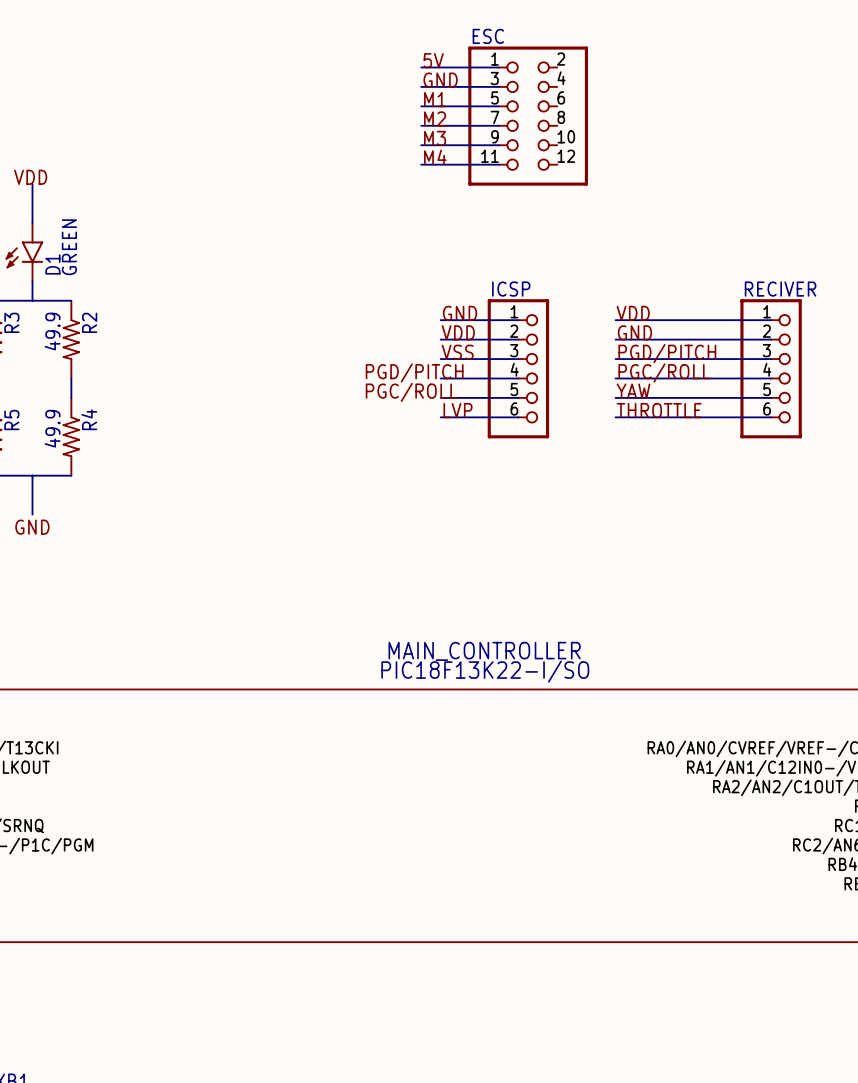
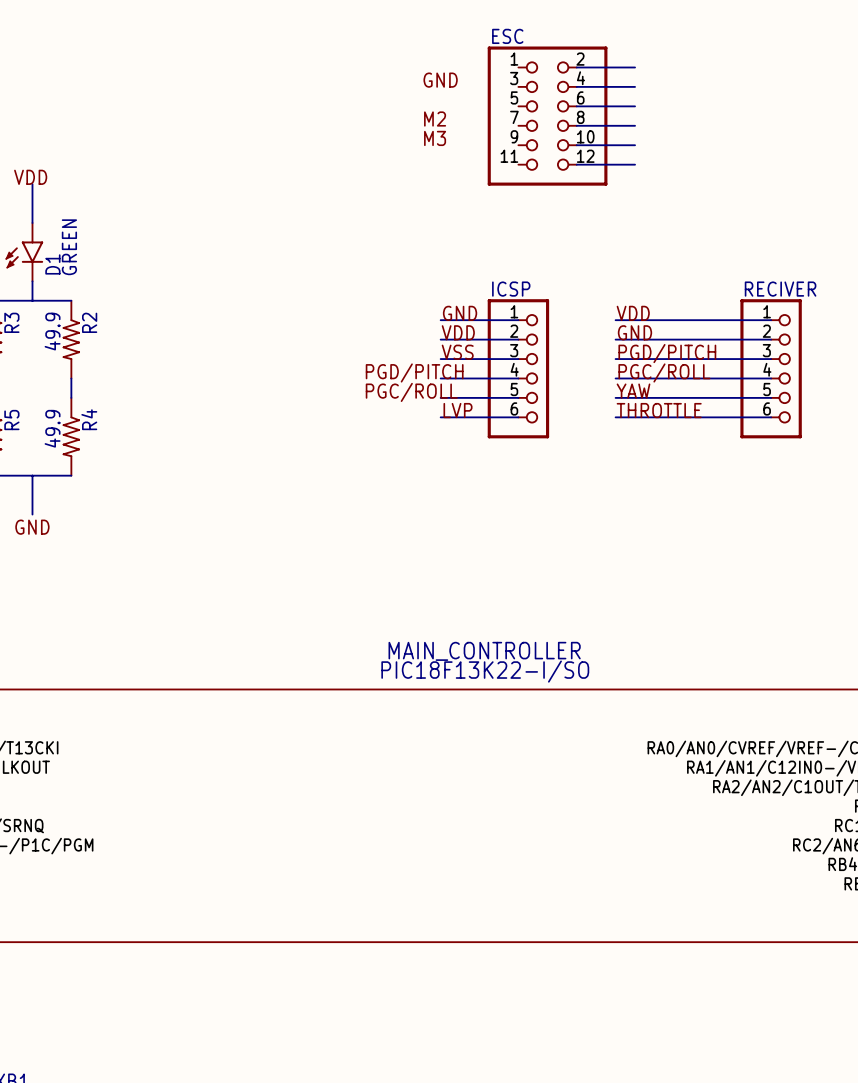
label: 5V (433, 60) -> none
wire: (421, 67) (498, 67) -> none
wire: none -> (576, 67) (635, 67)
wire: (421, 86) (498, 86) -> none
wire: none -> (576, 86) (635, 86)
label: M1 (435, 99) -> none
wire: (421, 106) (498, 106) -> none
wire: none -> (576, 106) (635, 106)
ESC position: (528, 116) -> (547, 116)
wire: (421, 125) (498, 125) -> none
wire: none -> (576, 125) (635, 125)
wire: (421, 145) (498, 145) -> none
wire: none -> (576, 145) (635, 145)
label: M4 (435, 157) -> none
wire: (421, 164) (498, 164) -> none
wire: none -> (576, 164) (635, 164)

